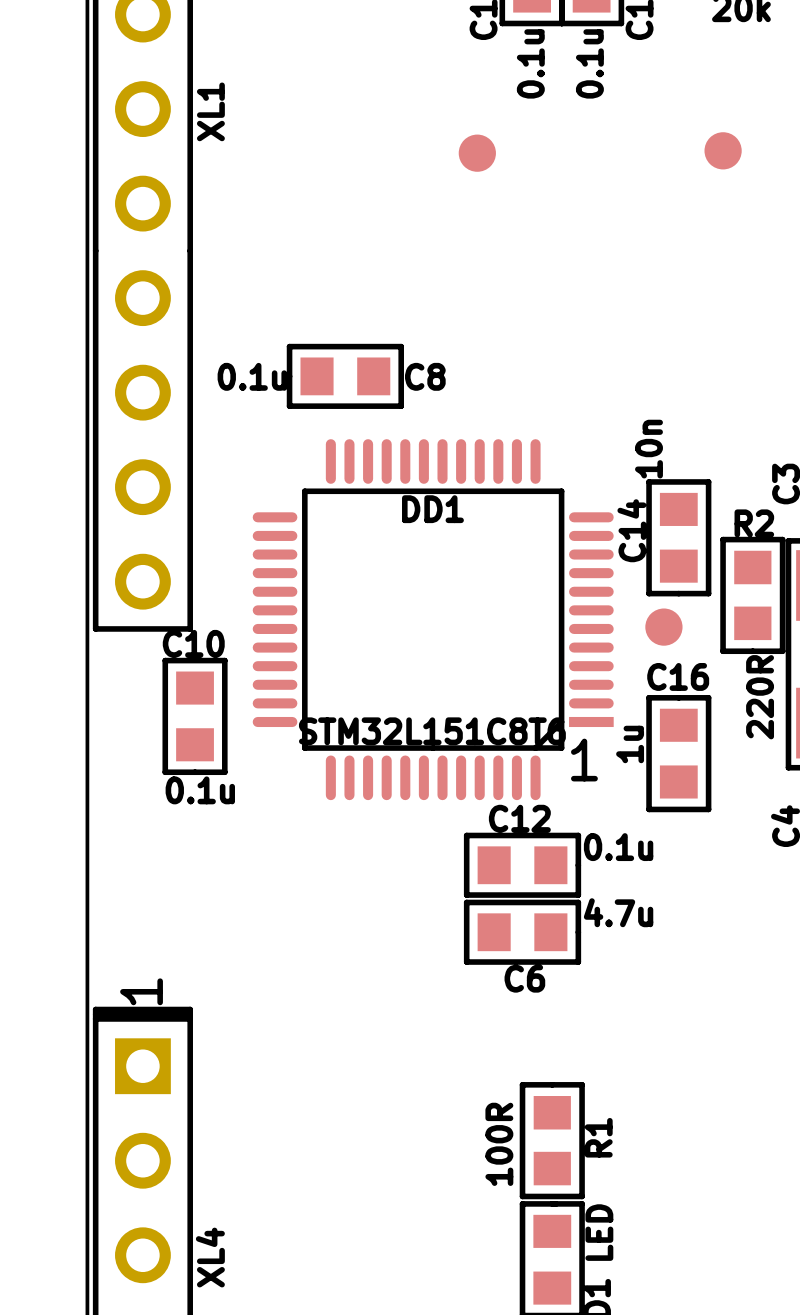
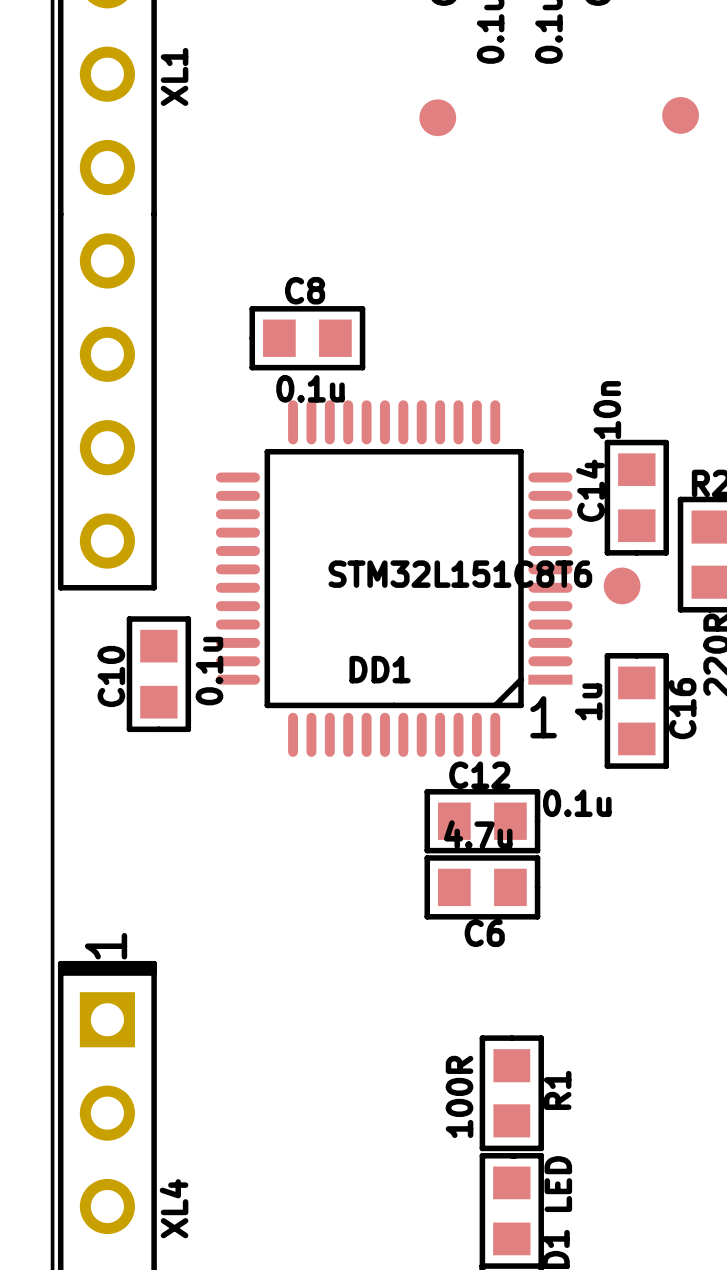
C8 value position: 0.1u (252, 376) -> 0.1u (310, 388)
C8 name position: C8 (425, 376) -> C8 (305, 290)
DD1 name position: DD1 (432, 509) -> DD1 (380, 669)
C10 name rotation: 0° (193, 643) -> 90° counterclockwise (111, 676)
C10 name position: C10 (193, 643) -> C10 (111, 676)
C16 name rotation: 0° (678, 676) -> 90° counterclockwise (682, 708)
C16 name position: C16 (678, 676) -> C16 (682, 708)
DD1 value position: STM32L151C8T6 (432, 731) -> STM32L151C8T6 (460, 574)
C10 value rotation: 0° (200, 790) -> 90° counterclockwise (209, 671)
C6 value position: 4.7u (618, 912) -> 4.7u (478, 834)

